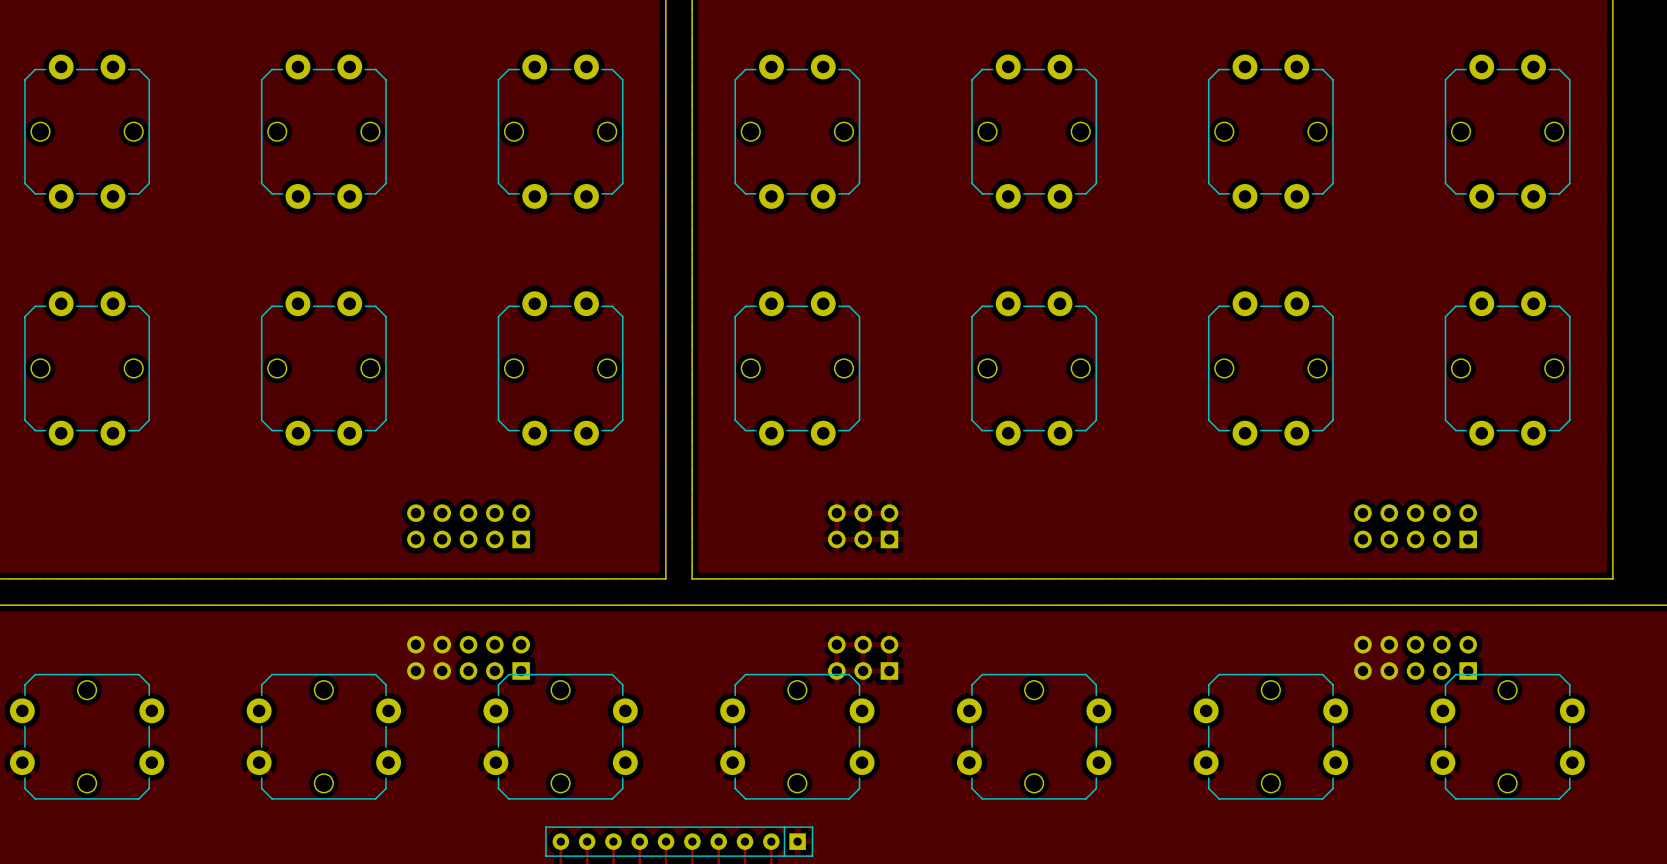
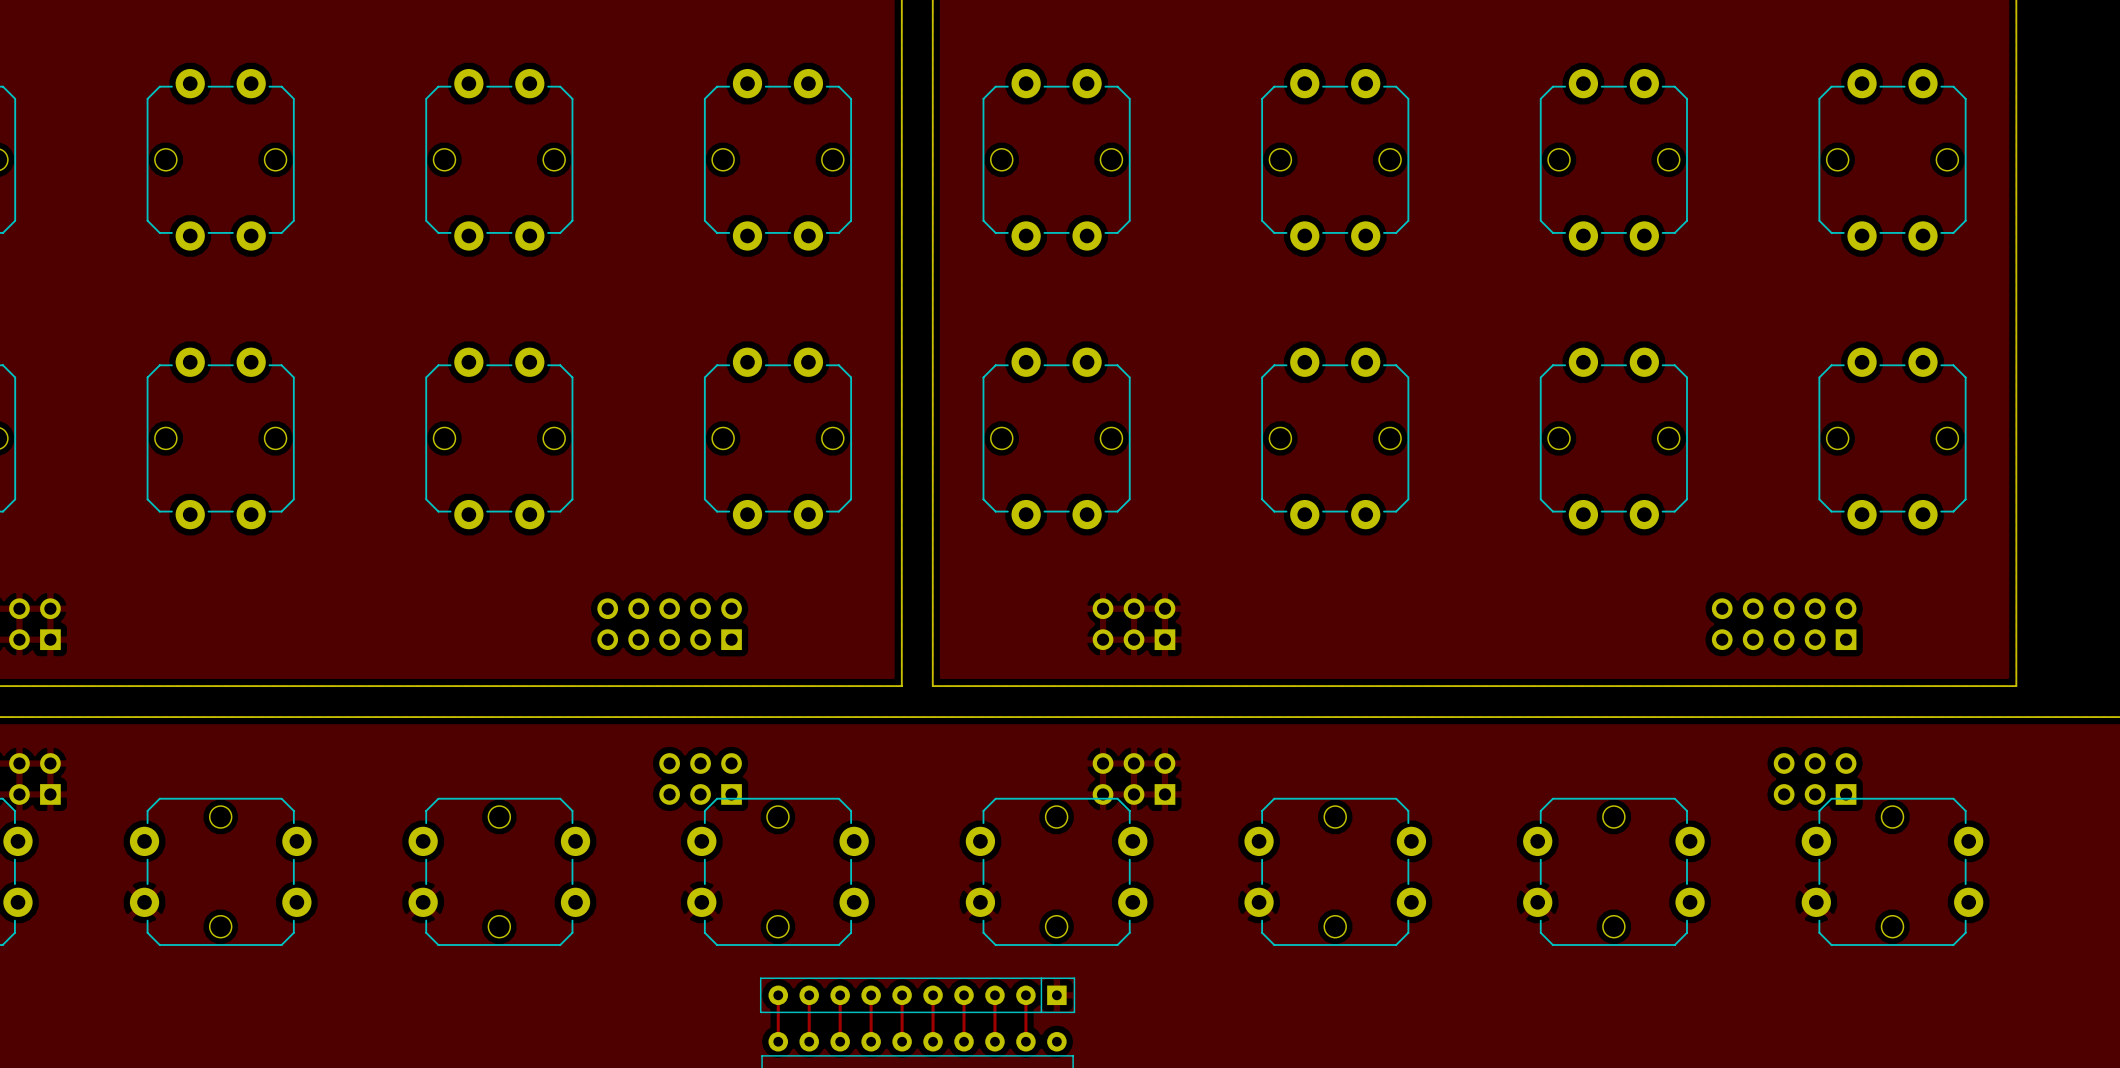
part: (468, 657) -> none
part: (1415, 657) -> none

